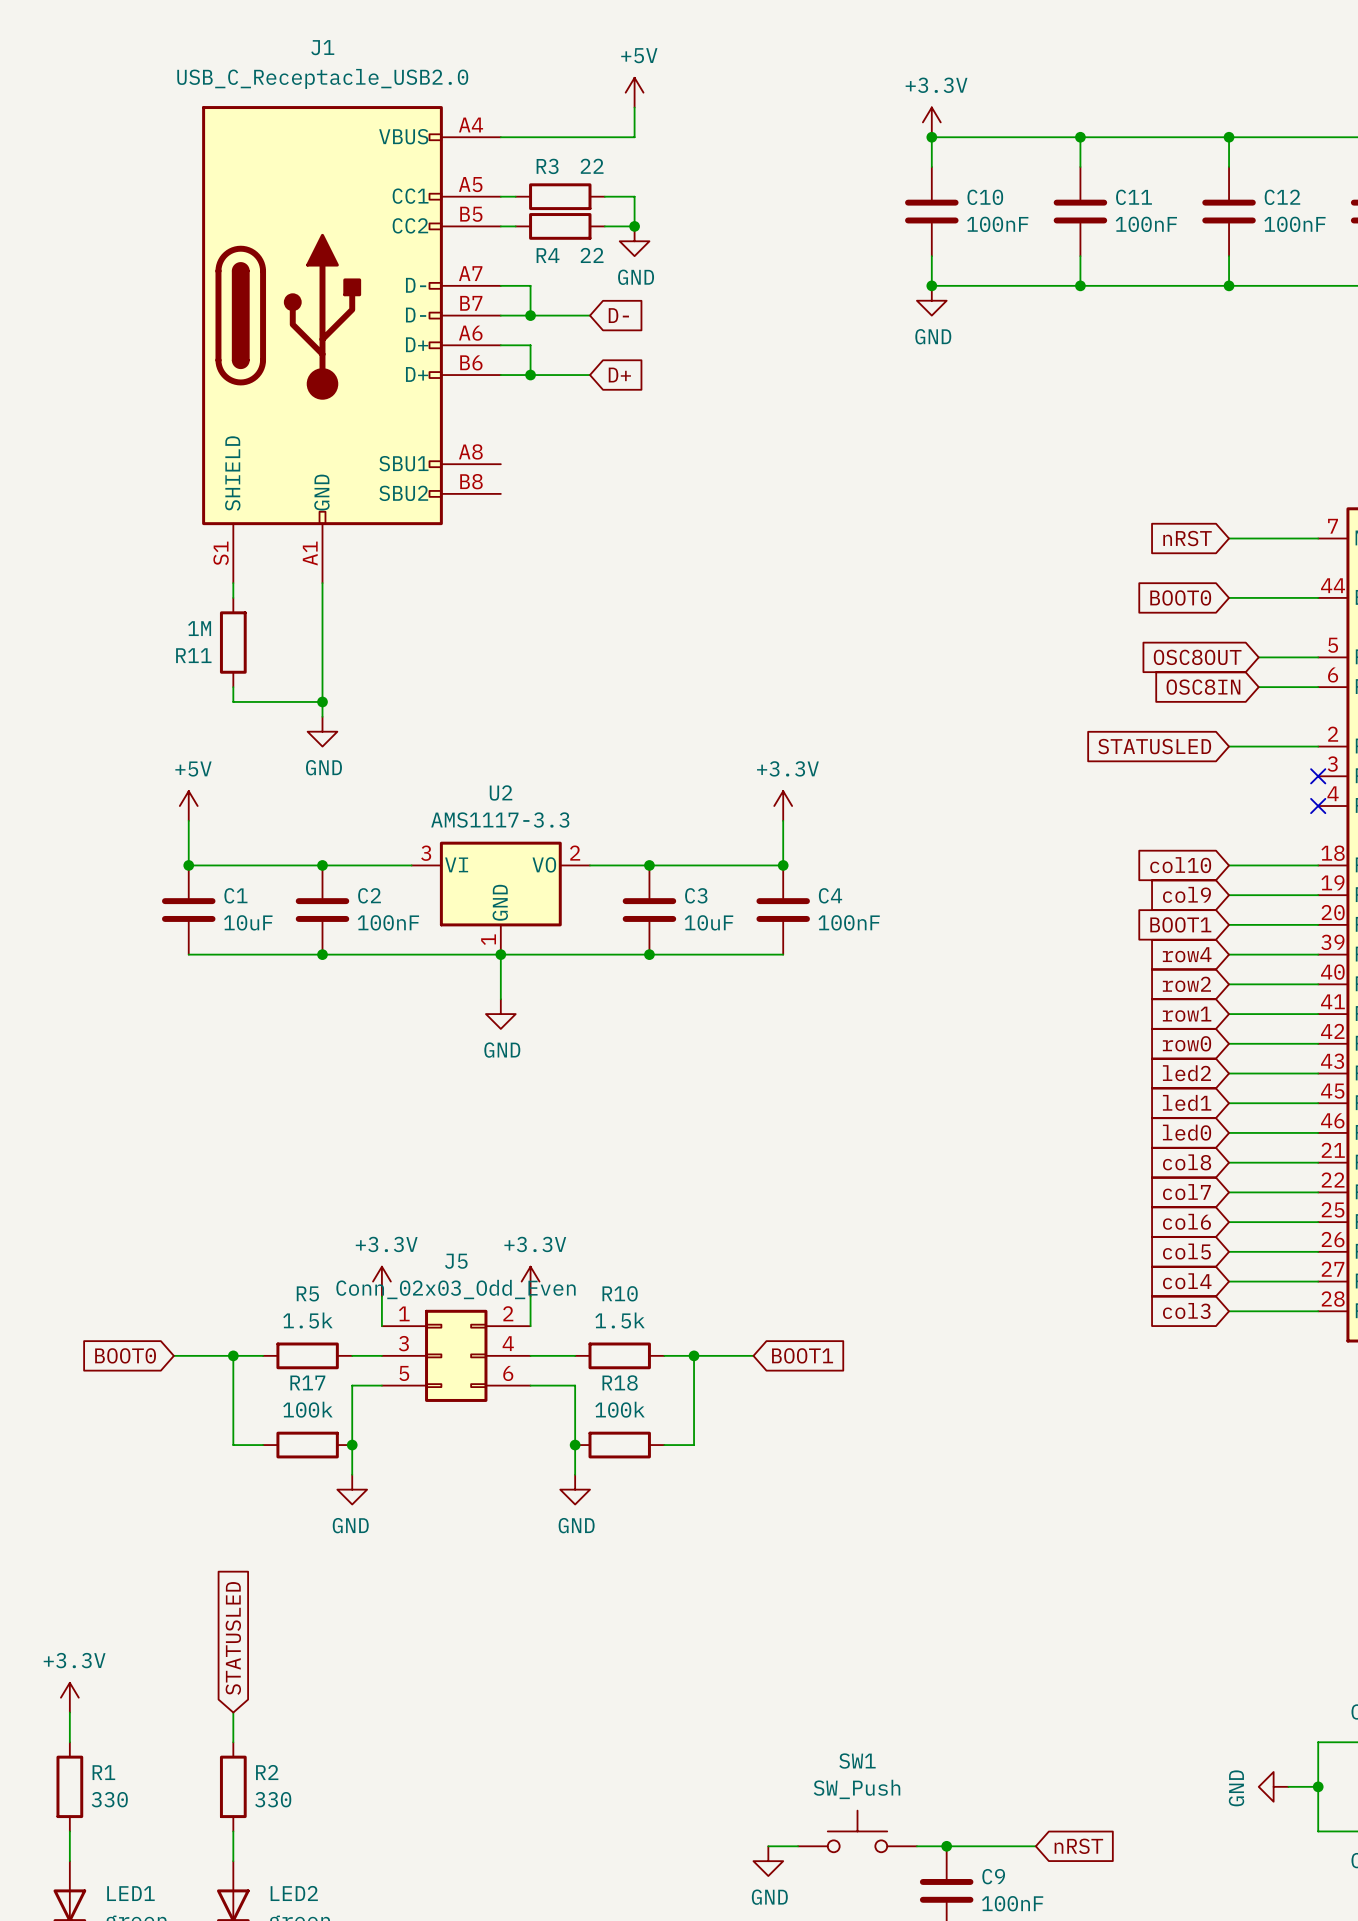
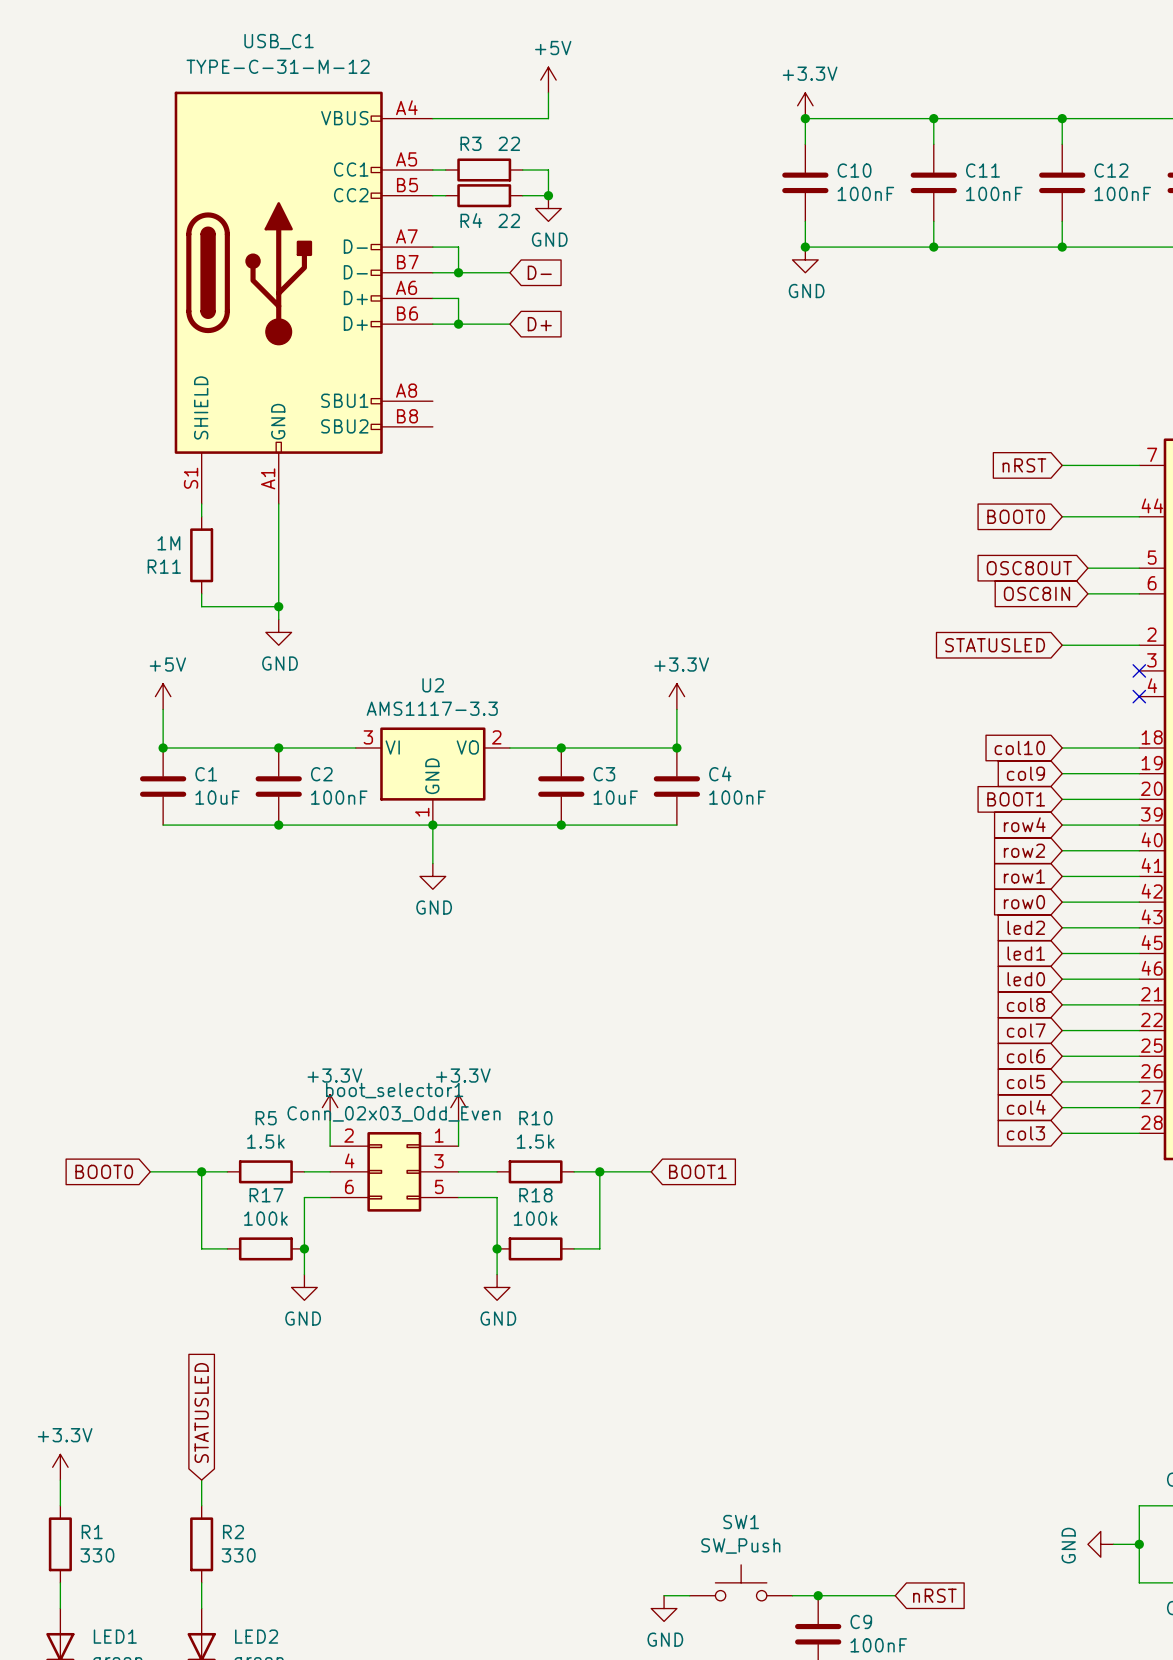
J1 name: J1 (322, 47) -> USB_C1 (279, 41)
J1 value: USB_C_Receptacle_USB2.0 (322, 78) -> TYPE-C-31-M-12 (278, 66)
J5 name: J5 (456, 1261) -> boot_selector1 (394, 1090)
J5 flip: as is (456, 1355) -> left-right (394, 1171)

